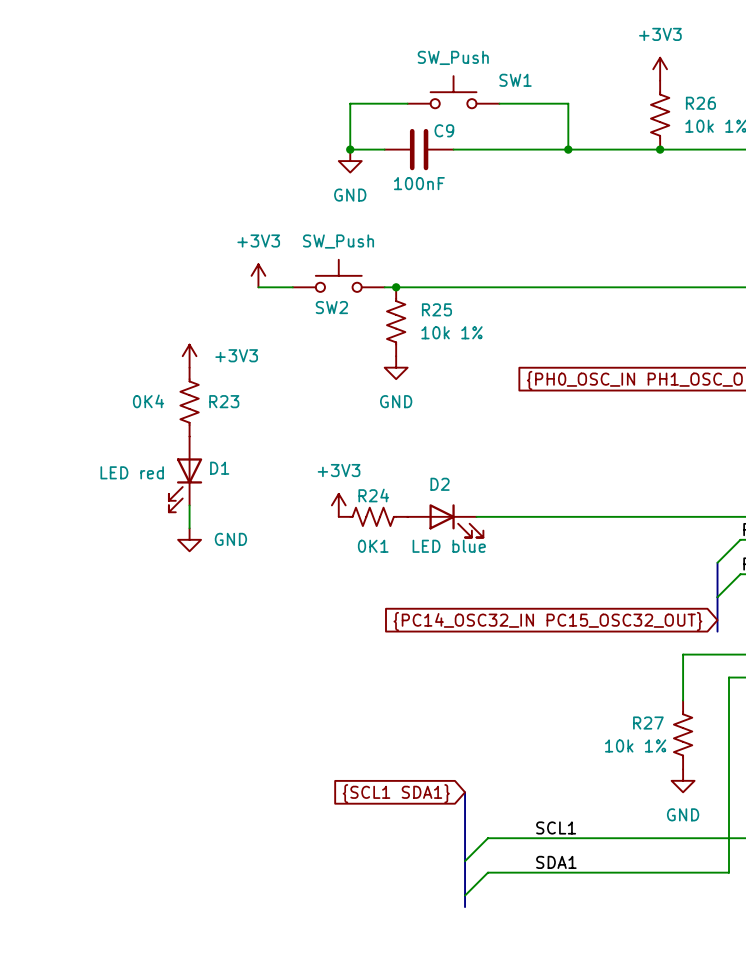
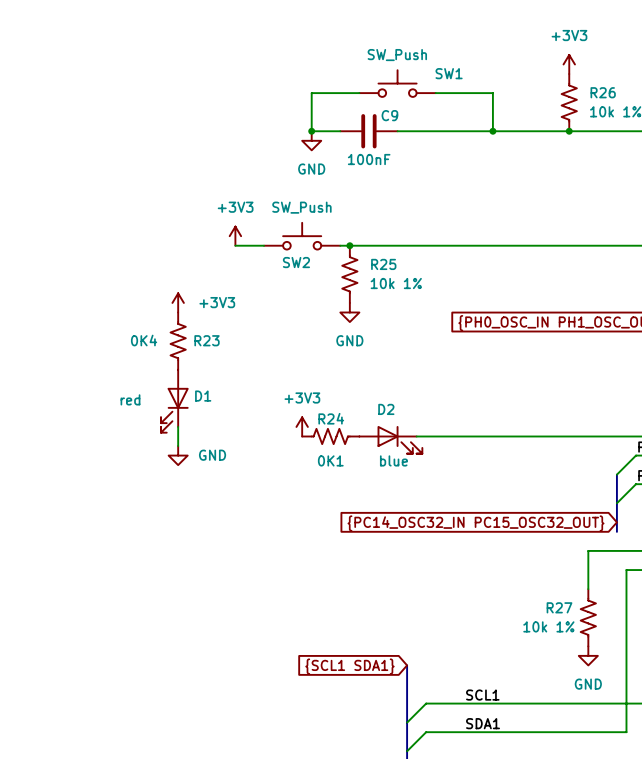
D1 value: LED red (132, 472) -> red (130, 399)
D2 value: LED blue (449, 546) -> blue (393, 460)

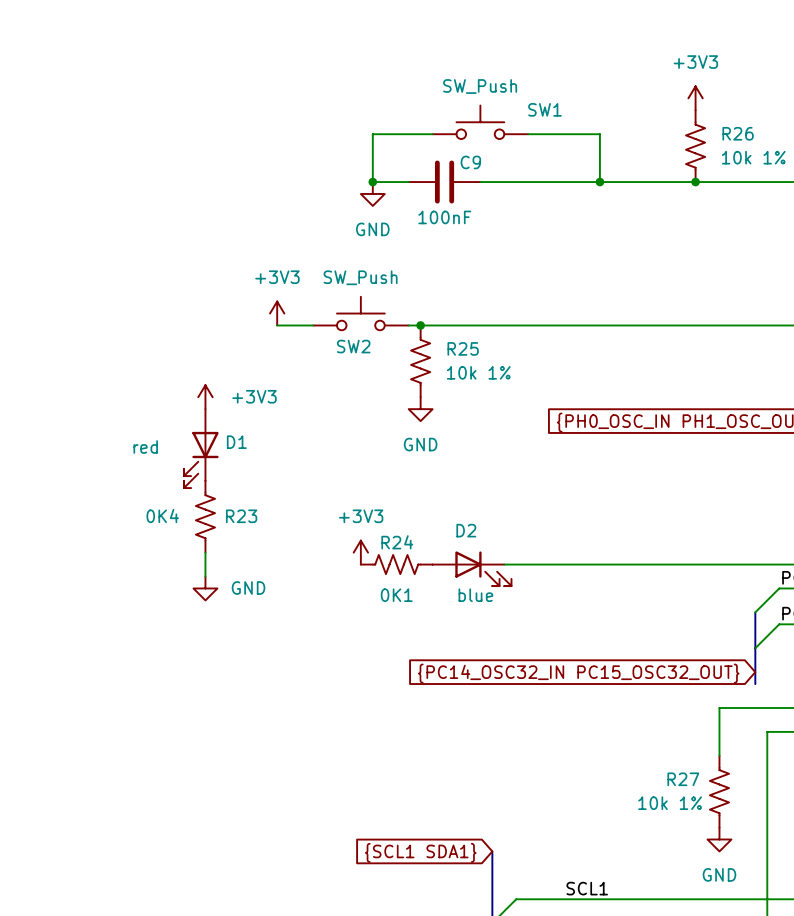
R23 position: (178, 341) -> (205, 516)
D1 position: (174, 401) -> (201, 448)

